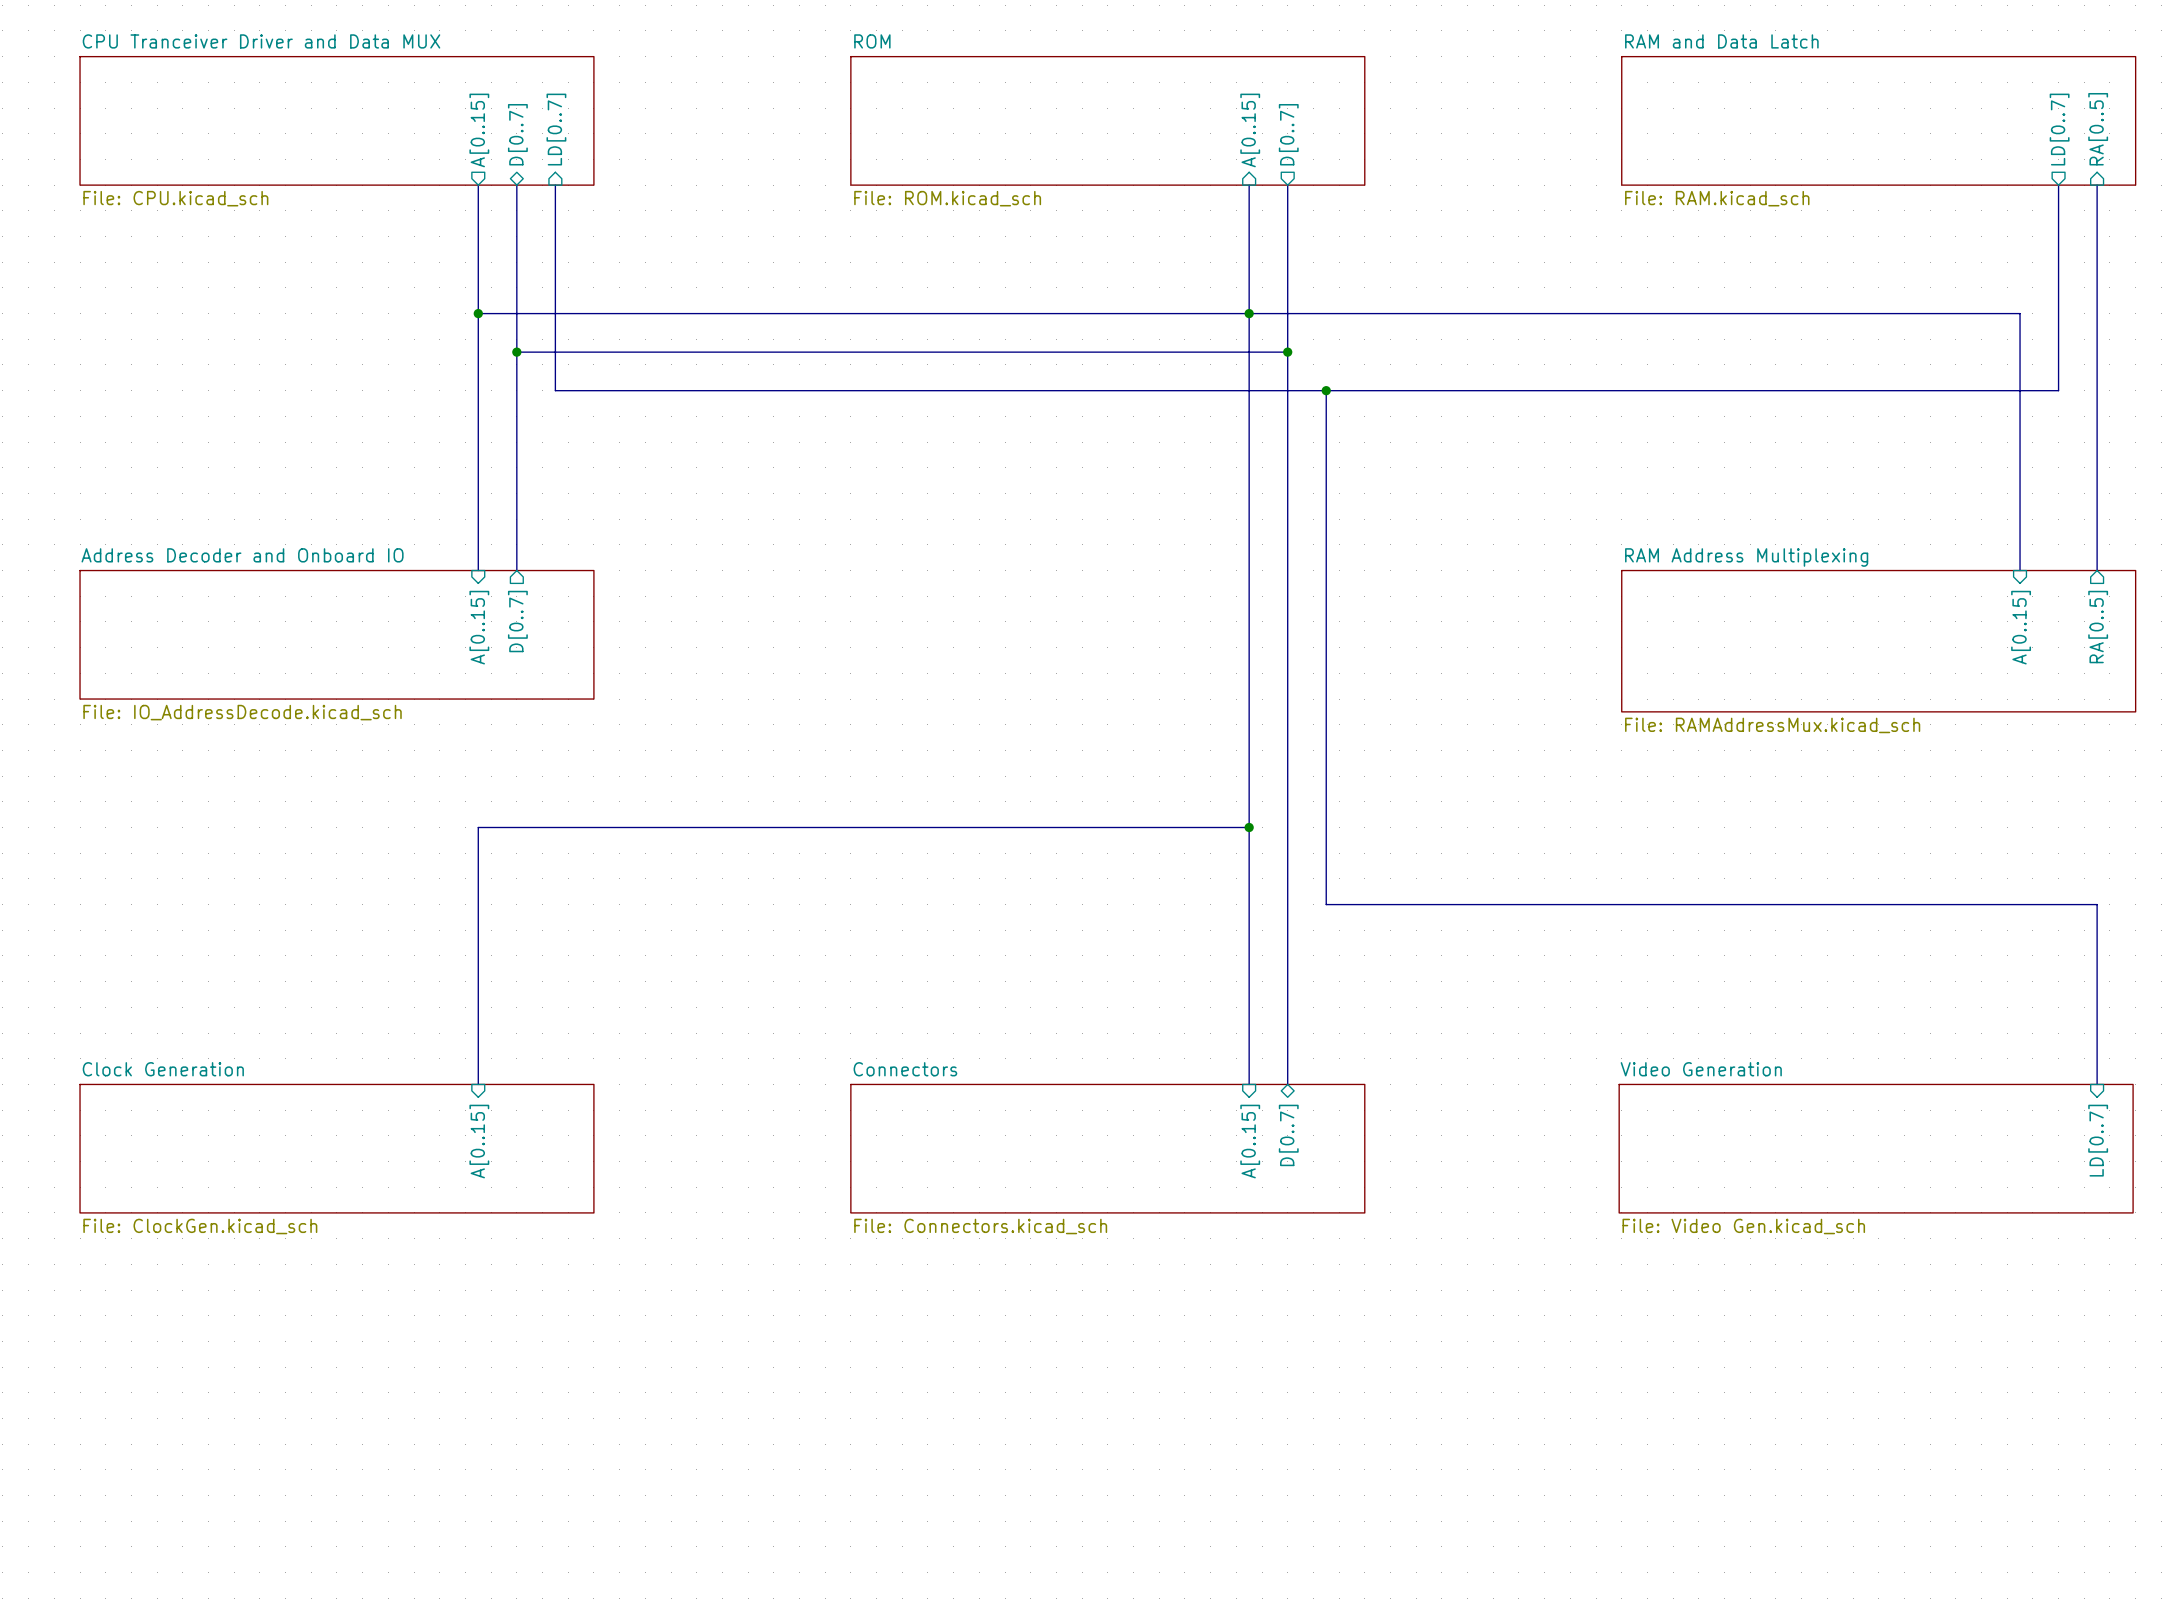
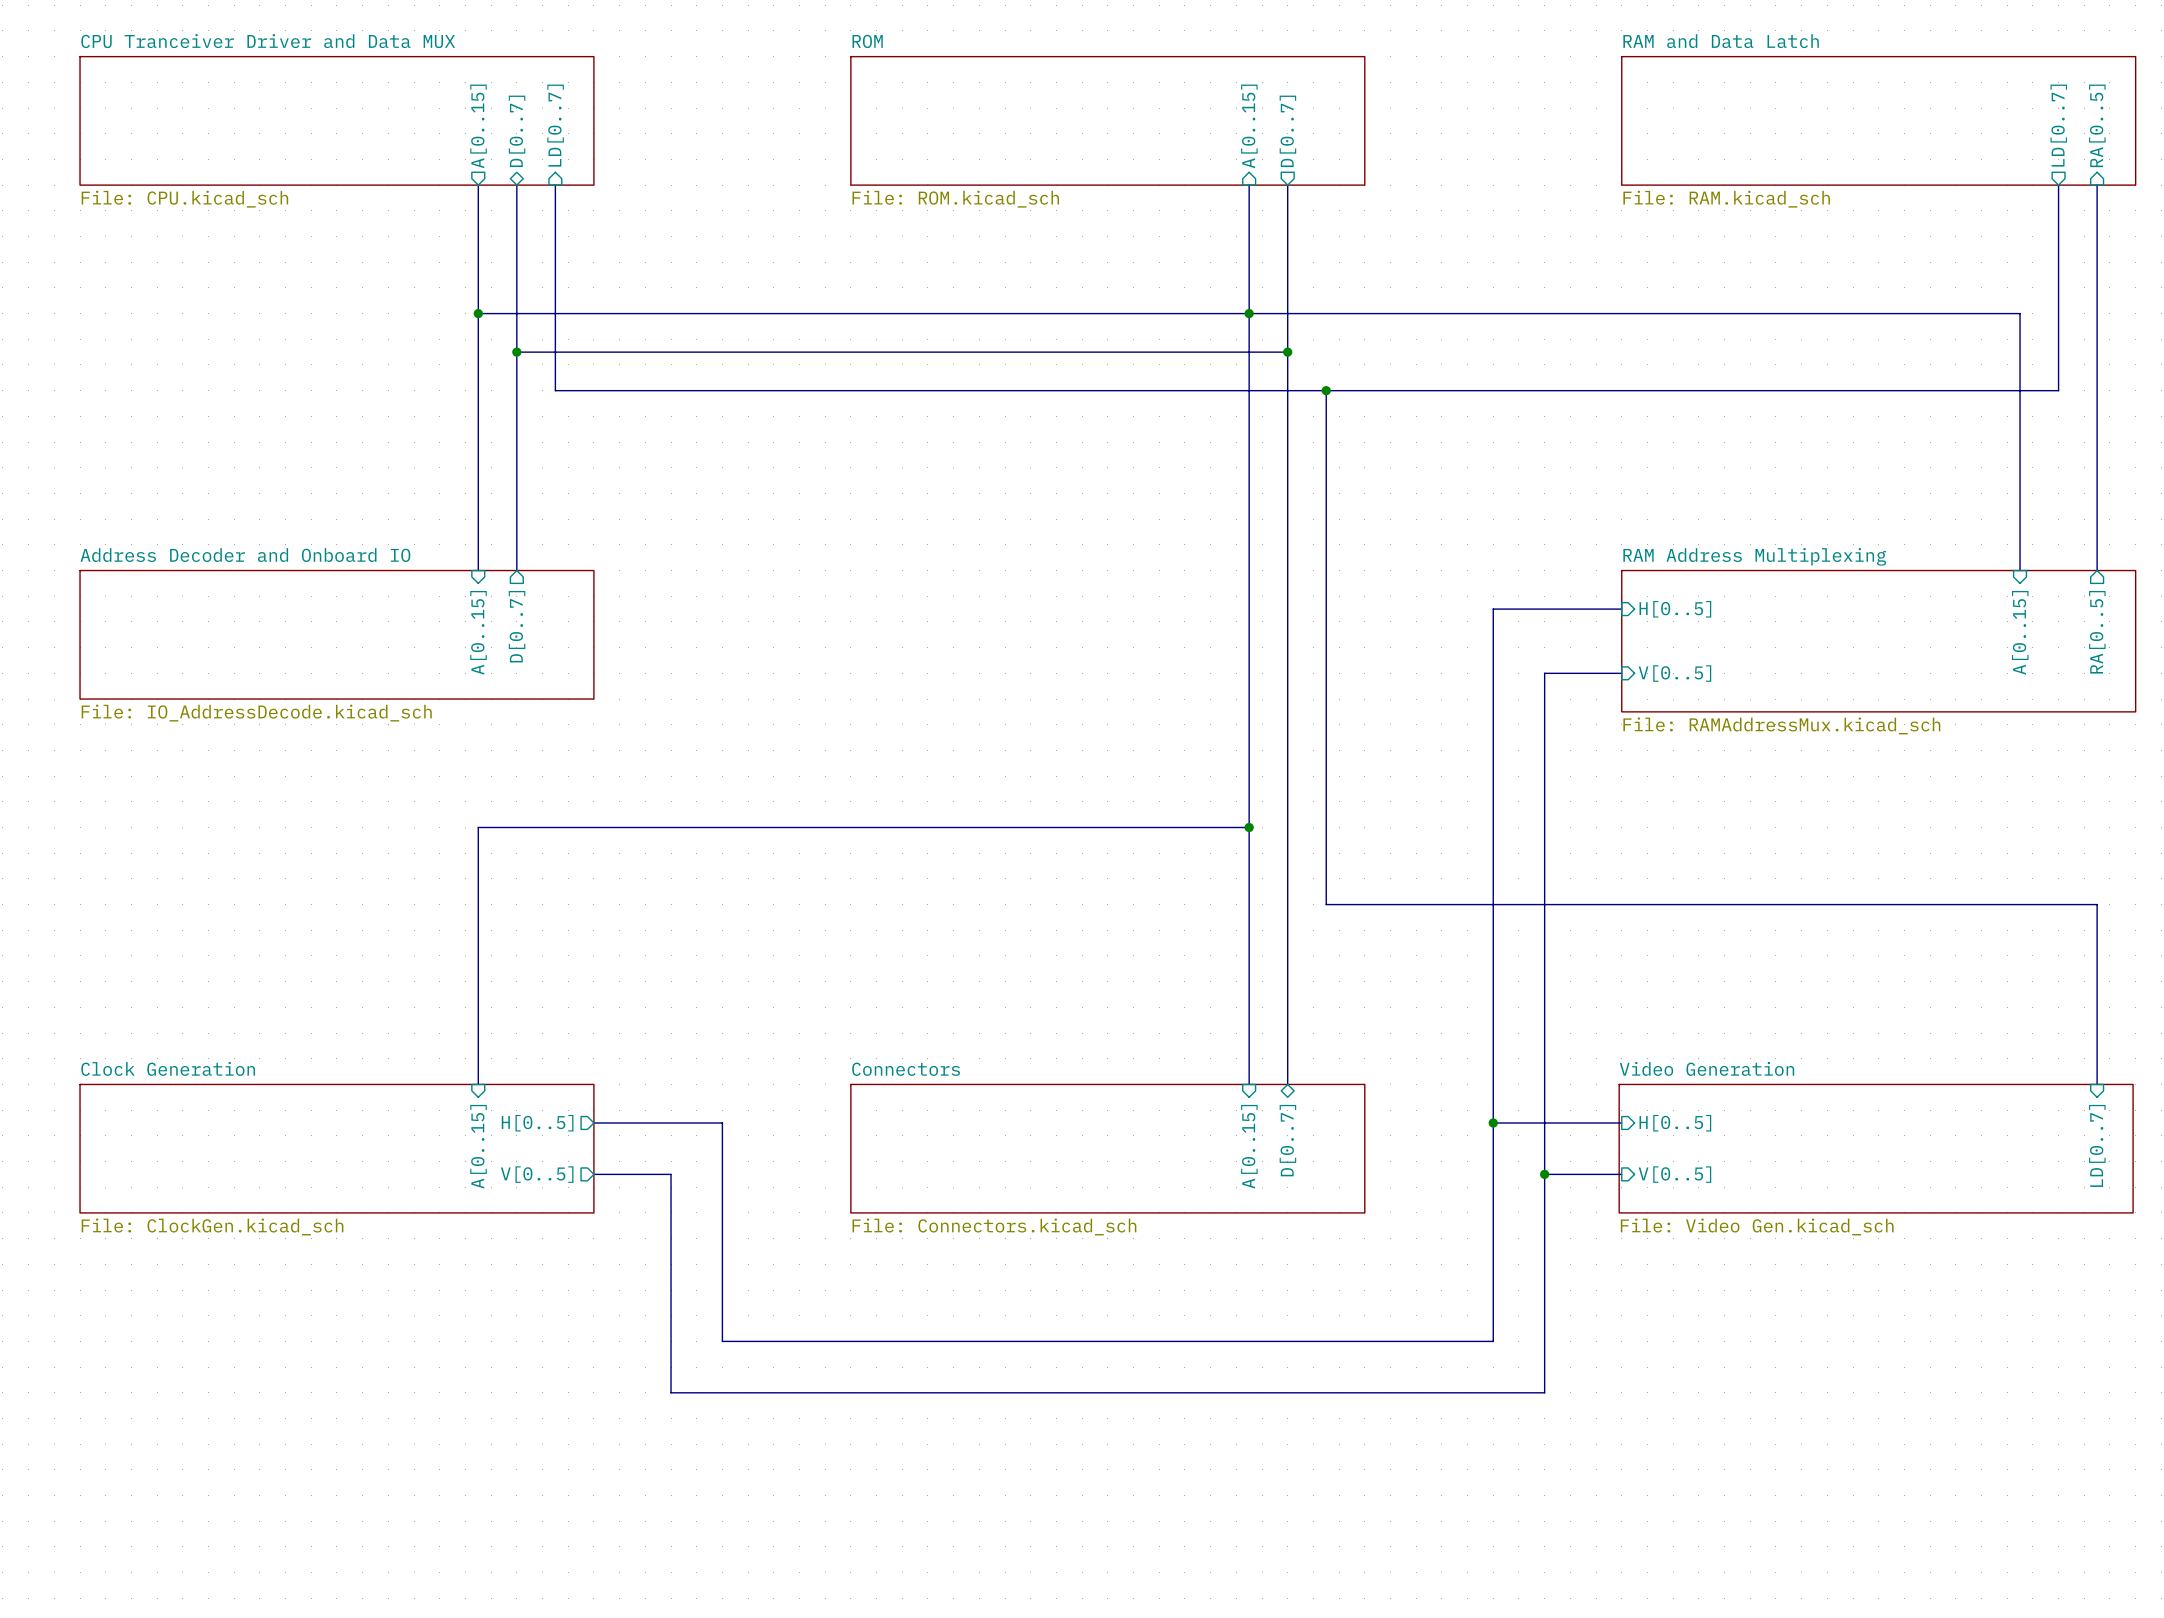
bus: none -> (1621, 609) (1493, 609) (1493, 1341) (722, 1341) (722, 1122) (593, 1122)
sheet pin: none -> H[0..5] (1675, 609)
bus: none -> (1621, 673) (1544, 673) (1544, 1392) (671, 1392) (671, 1174) (593, 1174)
sheet pin: none -> V[0..5] (1674, 673)
bus: none -> (1493, 1122) (1621, 1122)
junction: none -> (1493, 1122)
sheet pin: none -> H[0..5] (537, 1123)
sheet pin: none -> H[0..5] (1675, 1123)
bus: none -> (1544, 1174) (1621, 1174)
junction: none -> (1544, 1174)
sheet pin: none -> V[0..5] (537, 1174)
sheet pin: none -> V[0..5] (1674, 1174)

